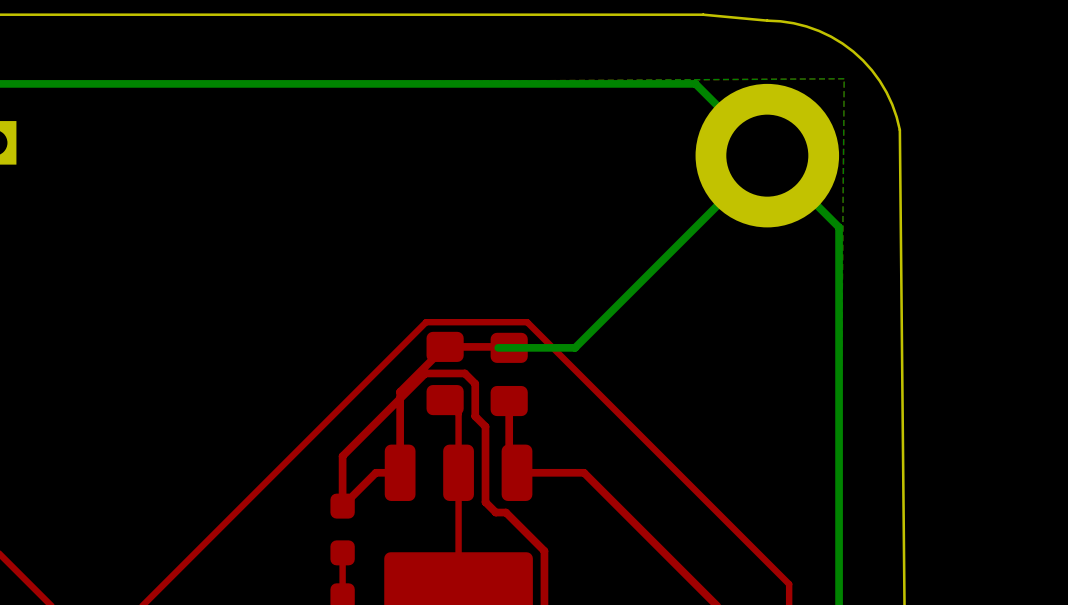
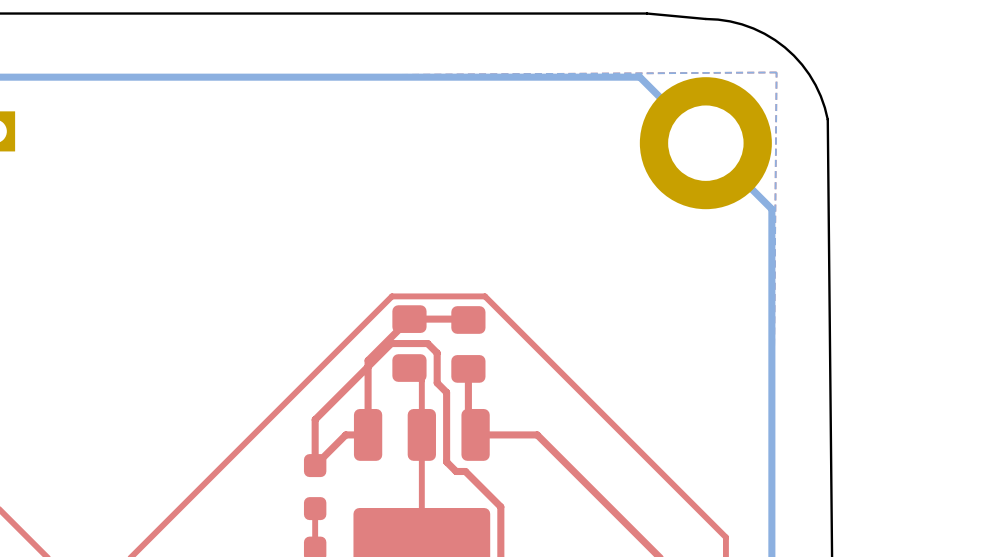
bottom track: (767, 155) (575, 347) (498, 347) -> none

